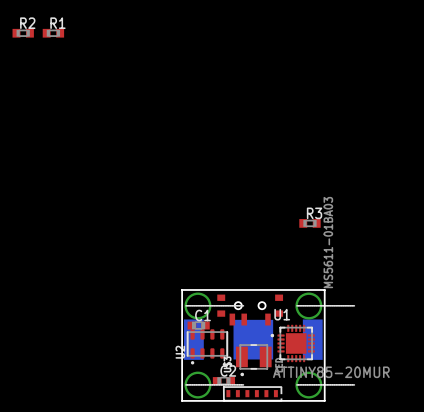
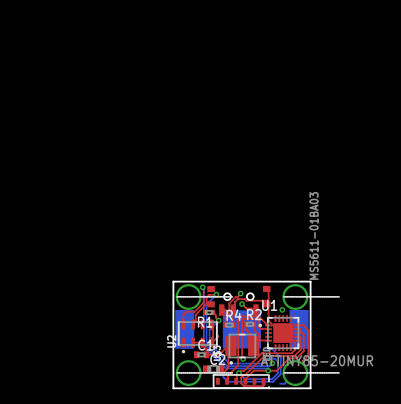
R1 name position: R1 (57, 23) -> R1 (205, 322)
R2 footprint: [12, 28, 34, 38] -> [243, 321, 257, 327]
R1 footprint: [42, 28, 65, 38] -> [203, 309, 216, 316]
R3: (309, 223) -> none
top track: none -> (202, 287) (203, 302) (194, 311) (186, 311) (183, 314) (183, 324)
bottom track: none -> (202, 287) (203, 346) (225, 368) (268, 368) (268, 370)
via: none -> (202, 287)
top track: none -> (268, 287) (268, 320) (280, 332)
top track: none -> (240, 293) (229, 303) (229, 315) (233, 319) (233, 325)
via: none -> (240, 293)
top track: none -> (216, 294) (208, 294) (206, 297) (206, 303) (195, 314) (195, 321) (193, 324)
bottom track: none -> (216, 294) (206, 304) (206, 345) (227, 366) (269, 366) (272, 363)
via: none -> (216, 294)
top track: none -> (268, 302) (266, 300) (237, 299) (235, 301) (234, 308)
top track: none -> (242, 304) (246, 308) (257, 308)
via: none -> (242, 304)
top track: none -> (223, 308) (225, 310) (225, 325)
via: none -> (282, 309)
C1 footprint: [187, 321, 210, 330] -> [193, 351, 210, 359]
top track: none -> (213, 312) (218, 320)
bottom track: none -> (218, 320) (209, 329) (209, 343) (229, 363) (262, 363) (267, 358) (275, 358) (277, 361) (277, 373) (272, 379) (244, 379) (238, 373)
via: none -> (218, 320)
top track: none -> (212, 324) (212, 342) (218, 335)
top track: none -> (246, 324) (246, 330) (251, 334) (251, 345)
top track: none -> (253, 324) (254, 330) (259, 335) (259, 340) (266, 340)
R4: none -> (229, 325)
top track: none -> (266, 325) (258, 316) (240, 316) (238, 318) (238, 365) (227, 375) (227, 380)
top track: none -> (295, 325) (303, 325) (308, 330) (308, 355) (302, 360) (302, 365) (295, 373)
top track: none -> (266, 329) (259, 327) (257, 318) (242, 318) (243, 358)
top track: none -> (295, 329) (298, 329) (303, 334) (303, 351) (296, 358) (289, 358) (276, 370) (253, 370) (246, 380)
top track: none -> (295, 336) (300, 337) (300, 349) (294, 356) (264, 356) (241, 377) (241, 383) (243, 386) (262, 386) (264, 380)
top track: none -> (295, 340) (295, 349) (291, 353) (261, 353) (244, 370) (241, 370) (236, 375) (236, 380)
top track: none -> (193, 342) (202, 342) (205, 345) (206, 354) (219, 354) (228, 345) (228, 368) (223, 372)
bottom track: none -> (265, 348) (271, 348) (280, 357) (280, 374) (273, 381) (227, 381) (223, 377) (223, 372)
via: none -> (243, 358)
via: none -> (272, 363)
via: none -> (268, 370)
via: none -> (238, 373)
bottom track: none -> (295, 373) (284, 383) (280, 383)

